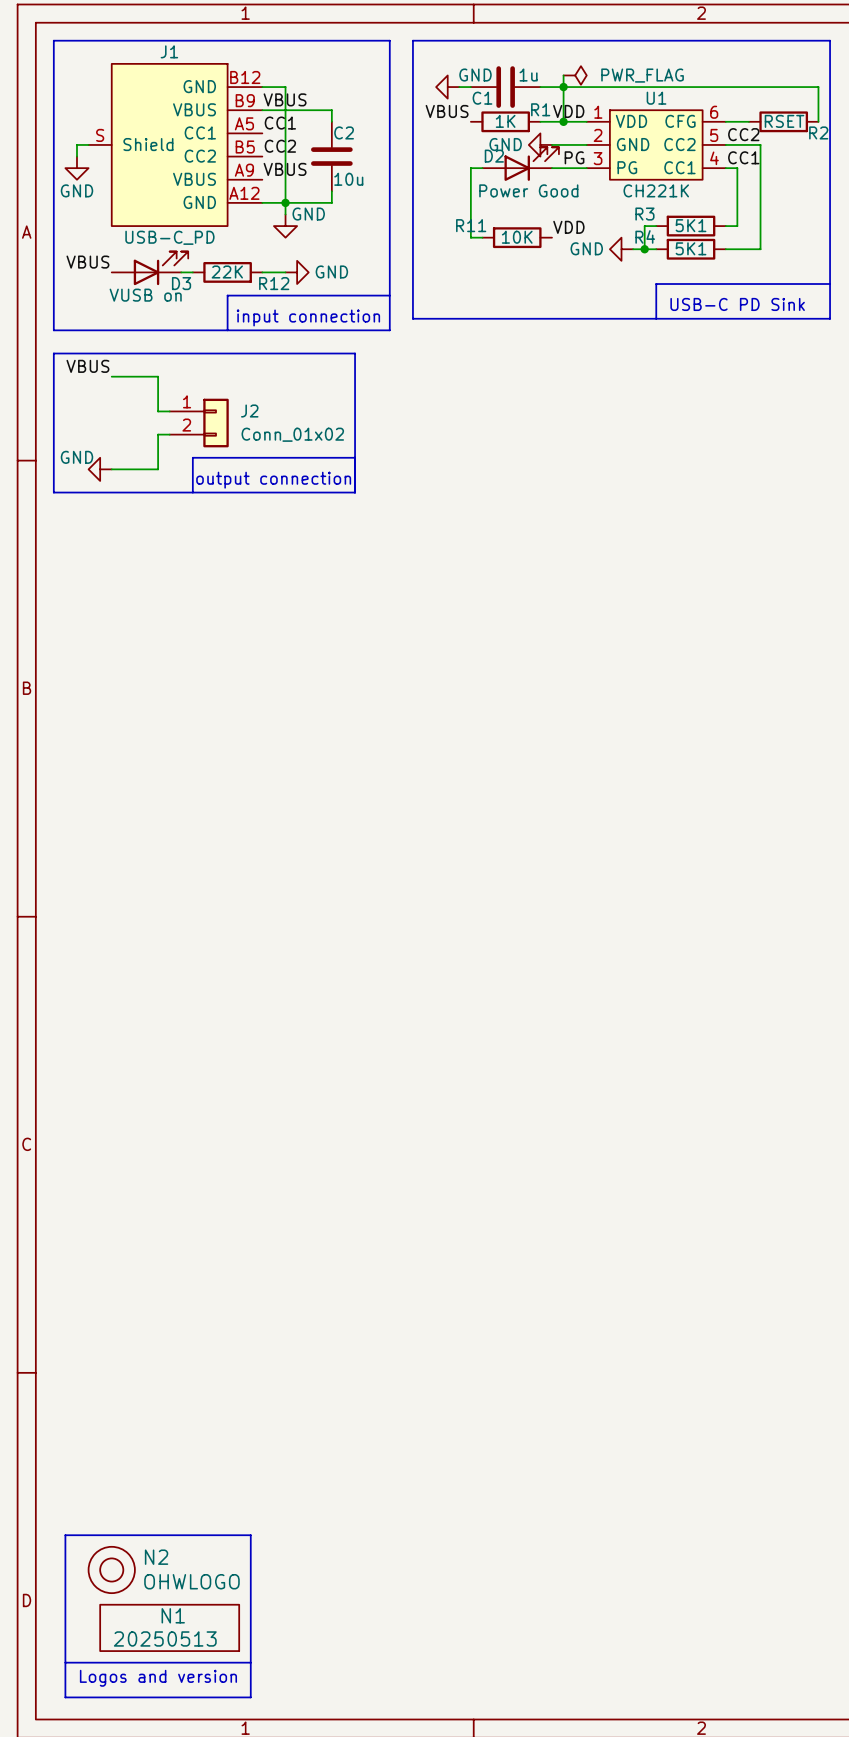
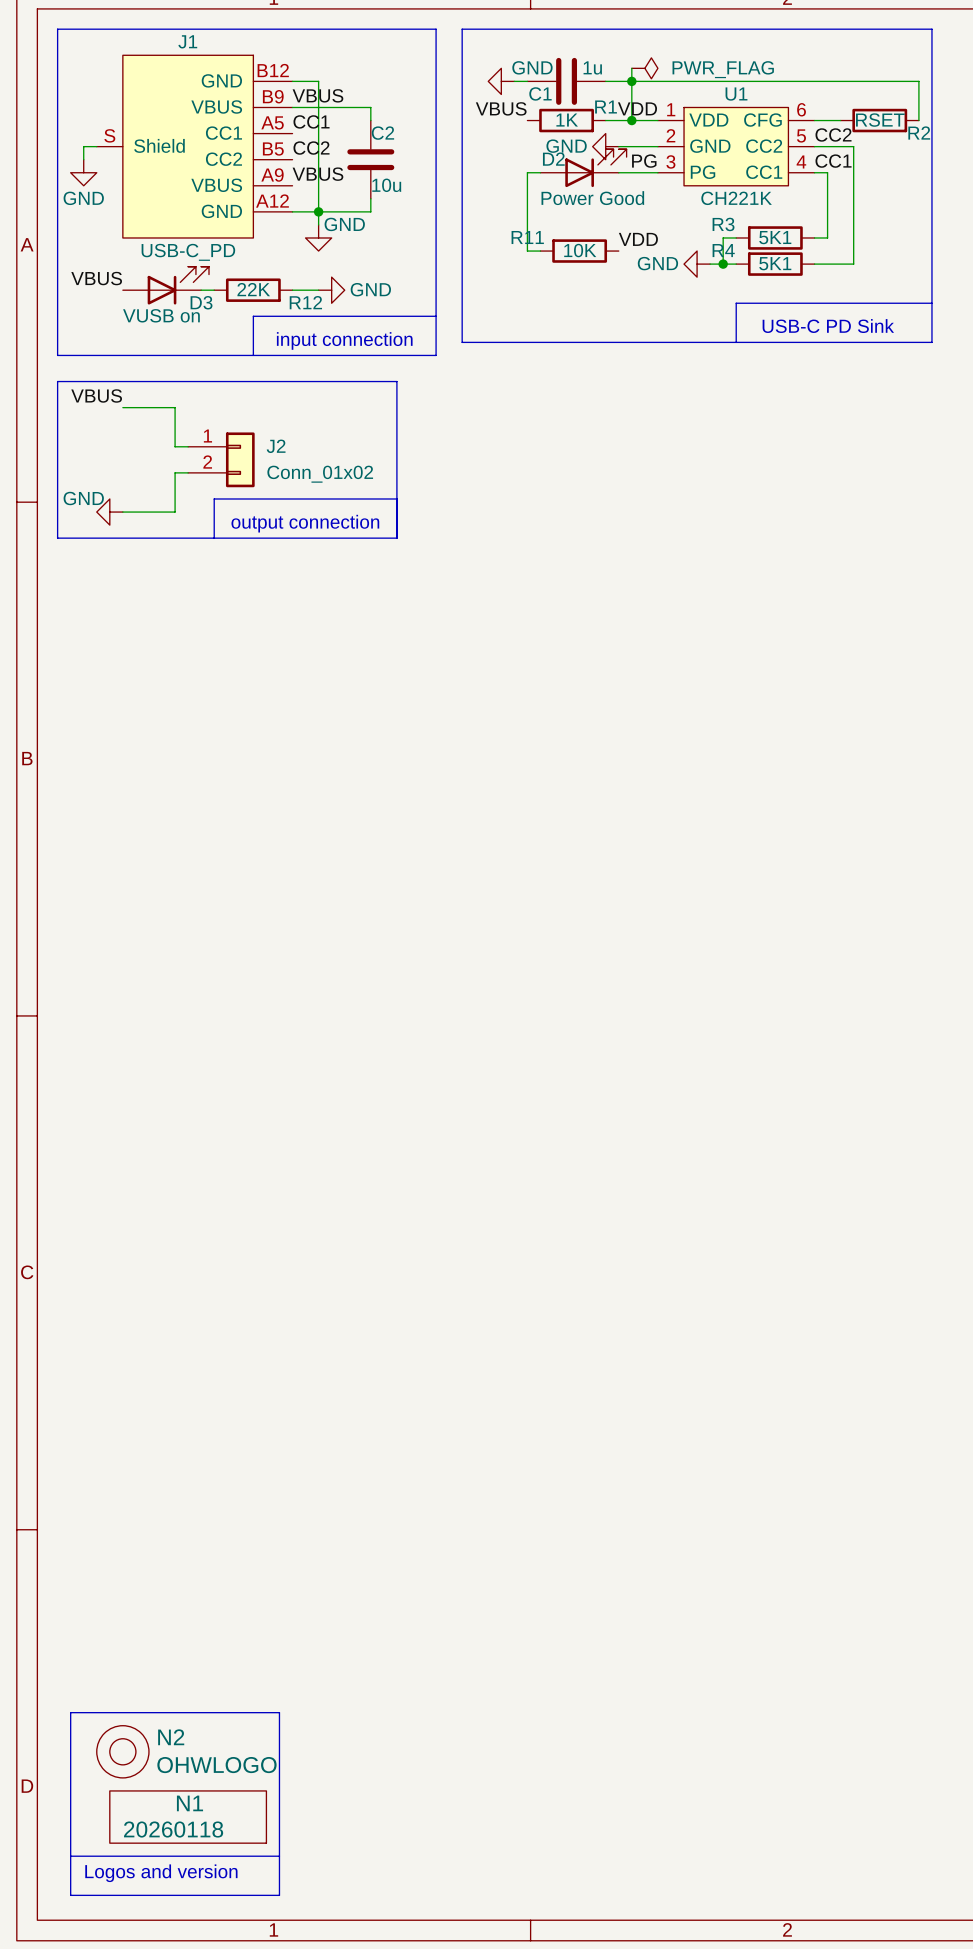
N1 value: 20250513 (165, 1638) -> 20260118 (173, 1829)

